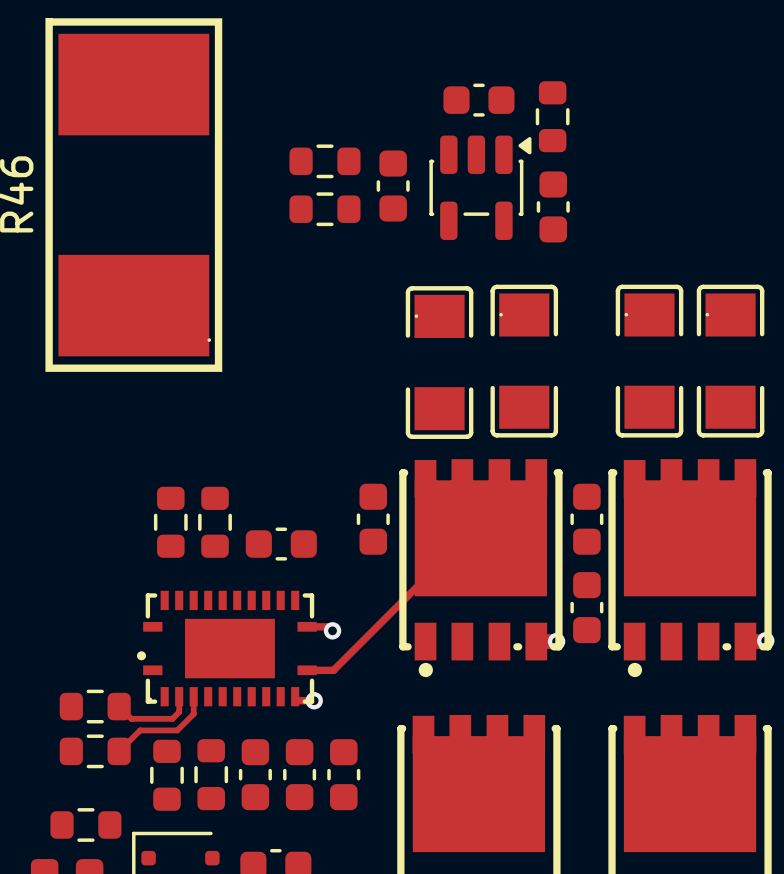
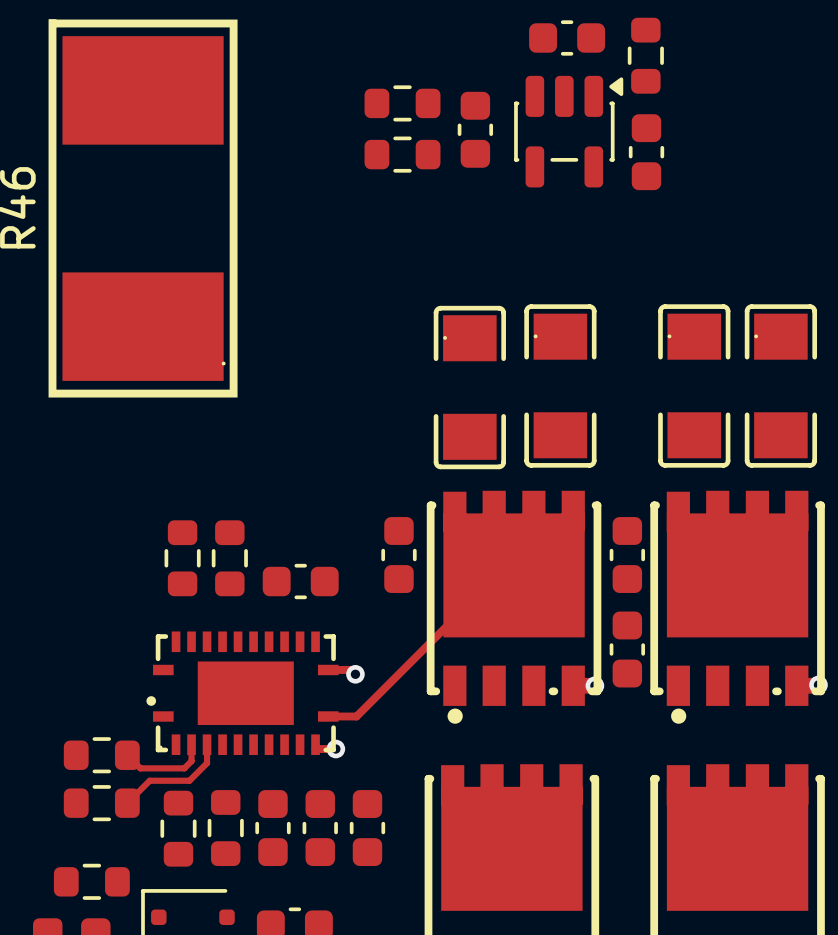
part: none -> (567, 37)
part: none -> (645, 55)
part footprint: [535, 81, 570, 153] -> [514, 75, 624, 188]
part: none -> (402, 103)
part rotation: 0° (478, 100) -> 90° clockwise (475, 129)
part: none -> (646, 152)
part: none -> (402, 154)
part: (325, 161) -> none
part: (393, 186) -> none
part: (480, 187) -> none
part: (553, 206) -> none
part: (325, 209) -> none

